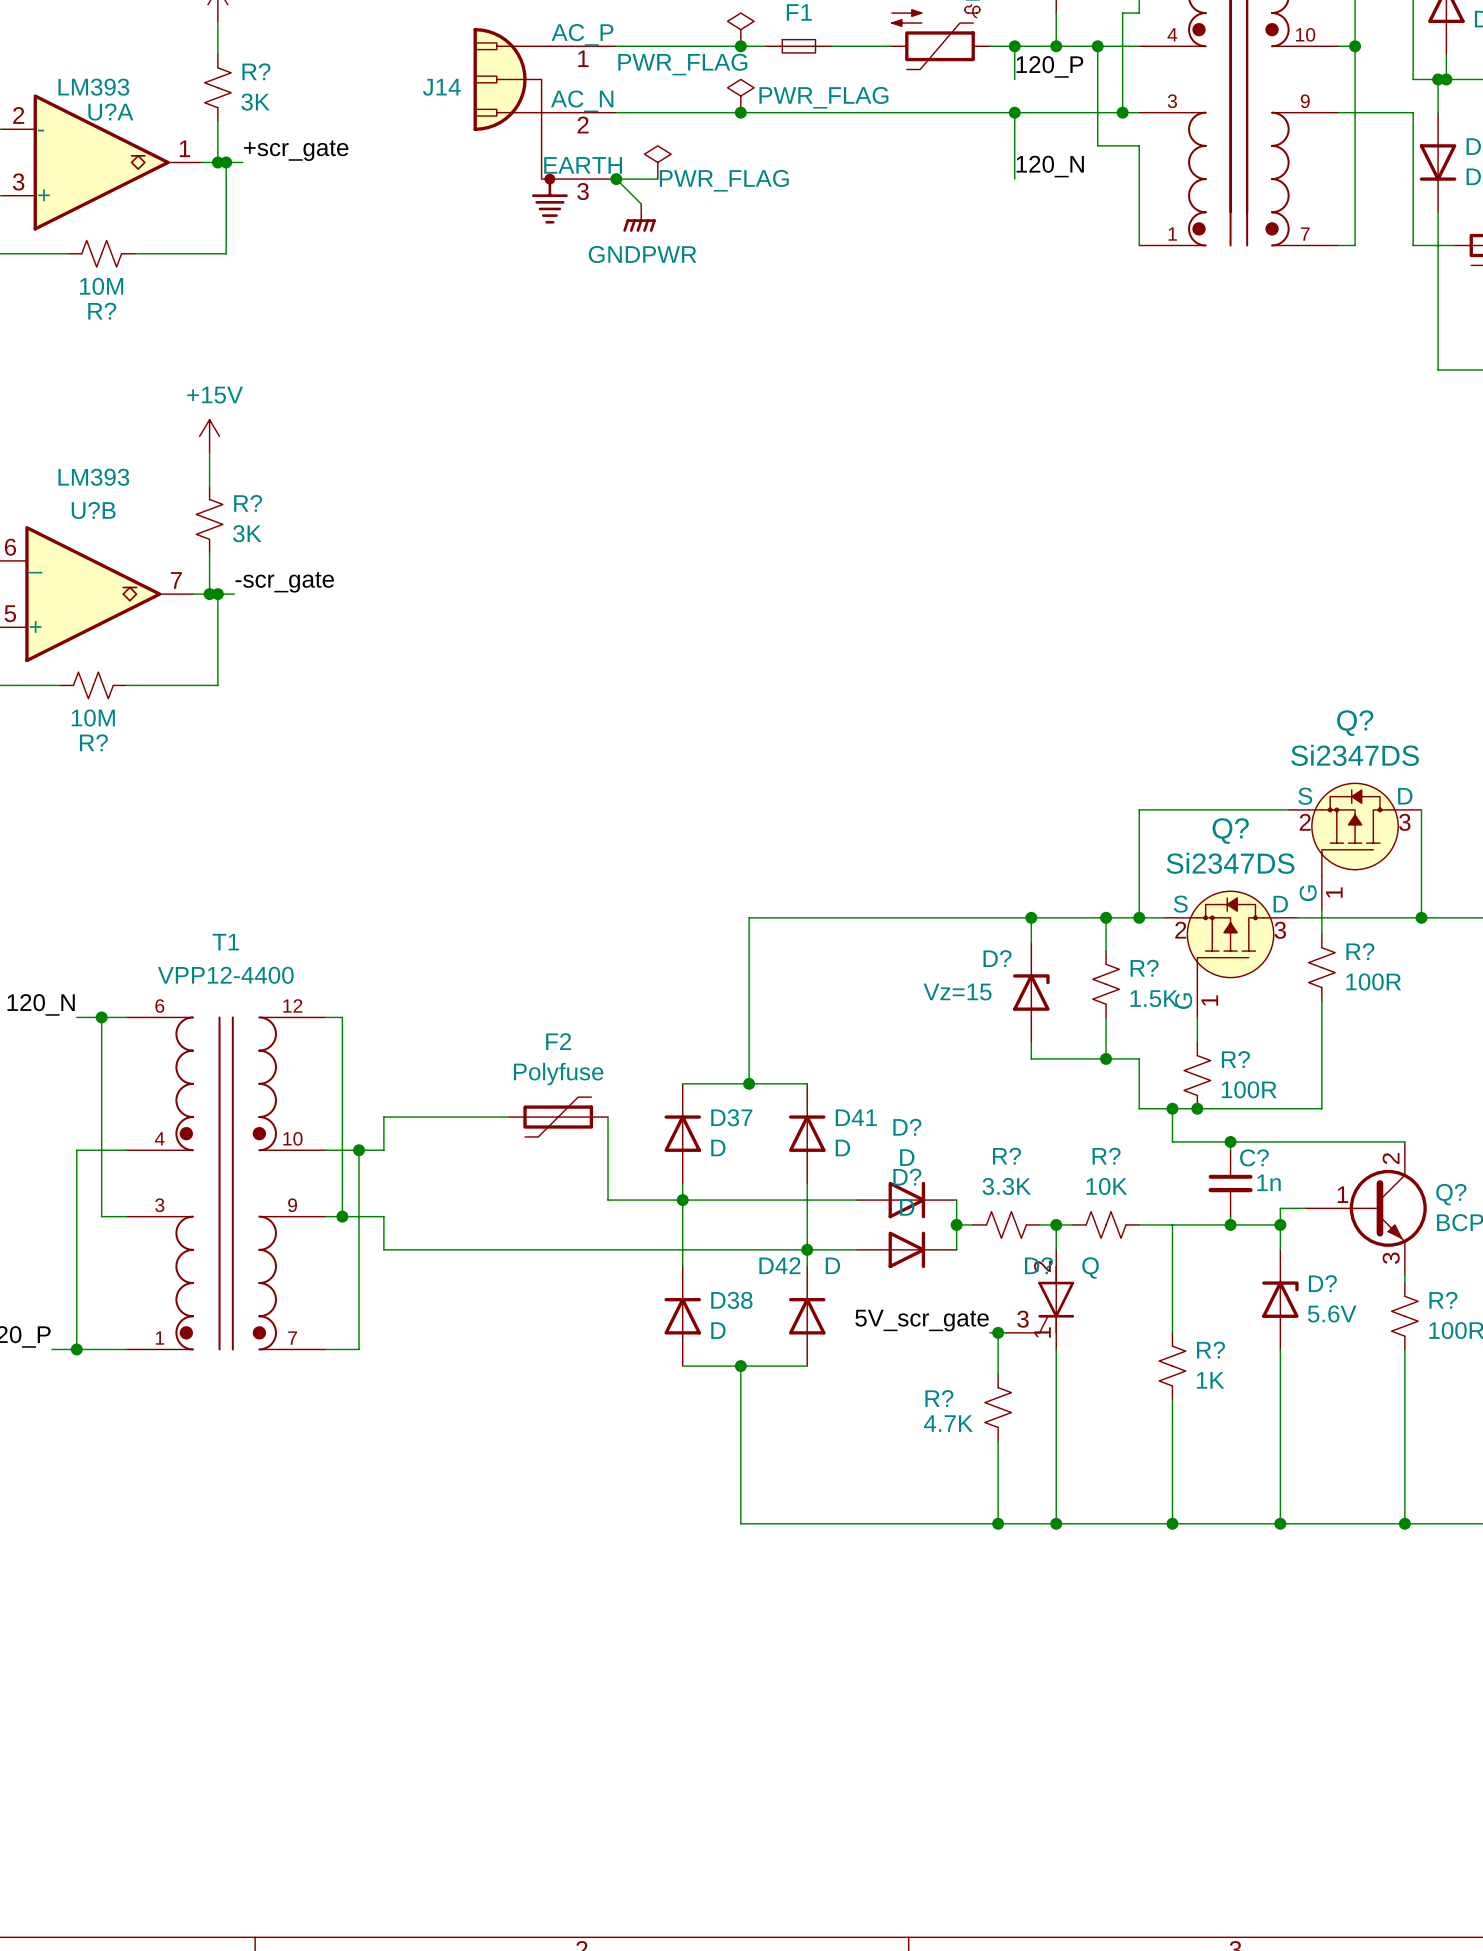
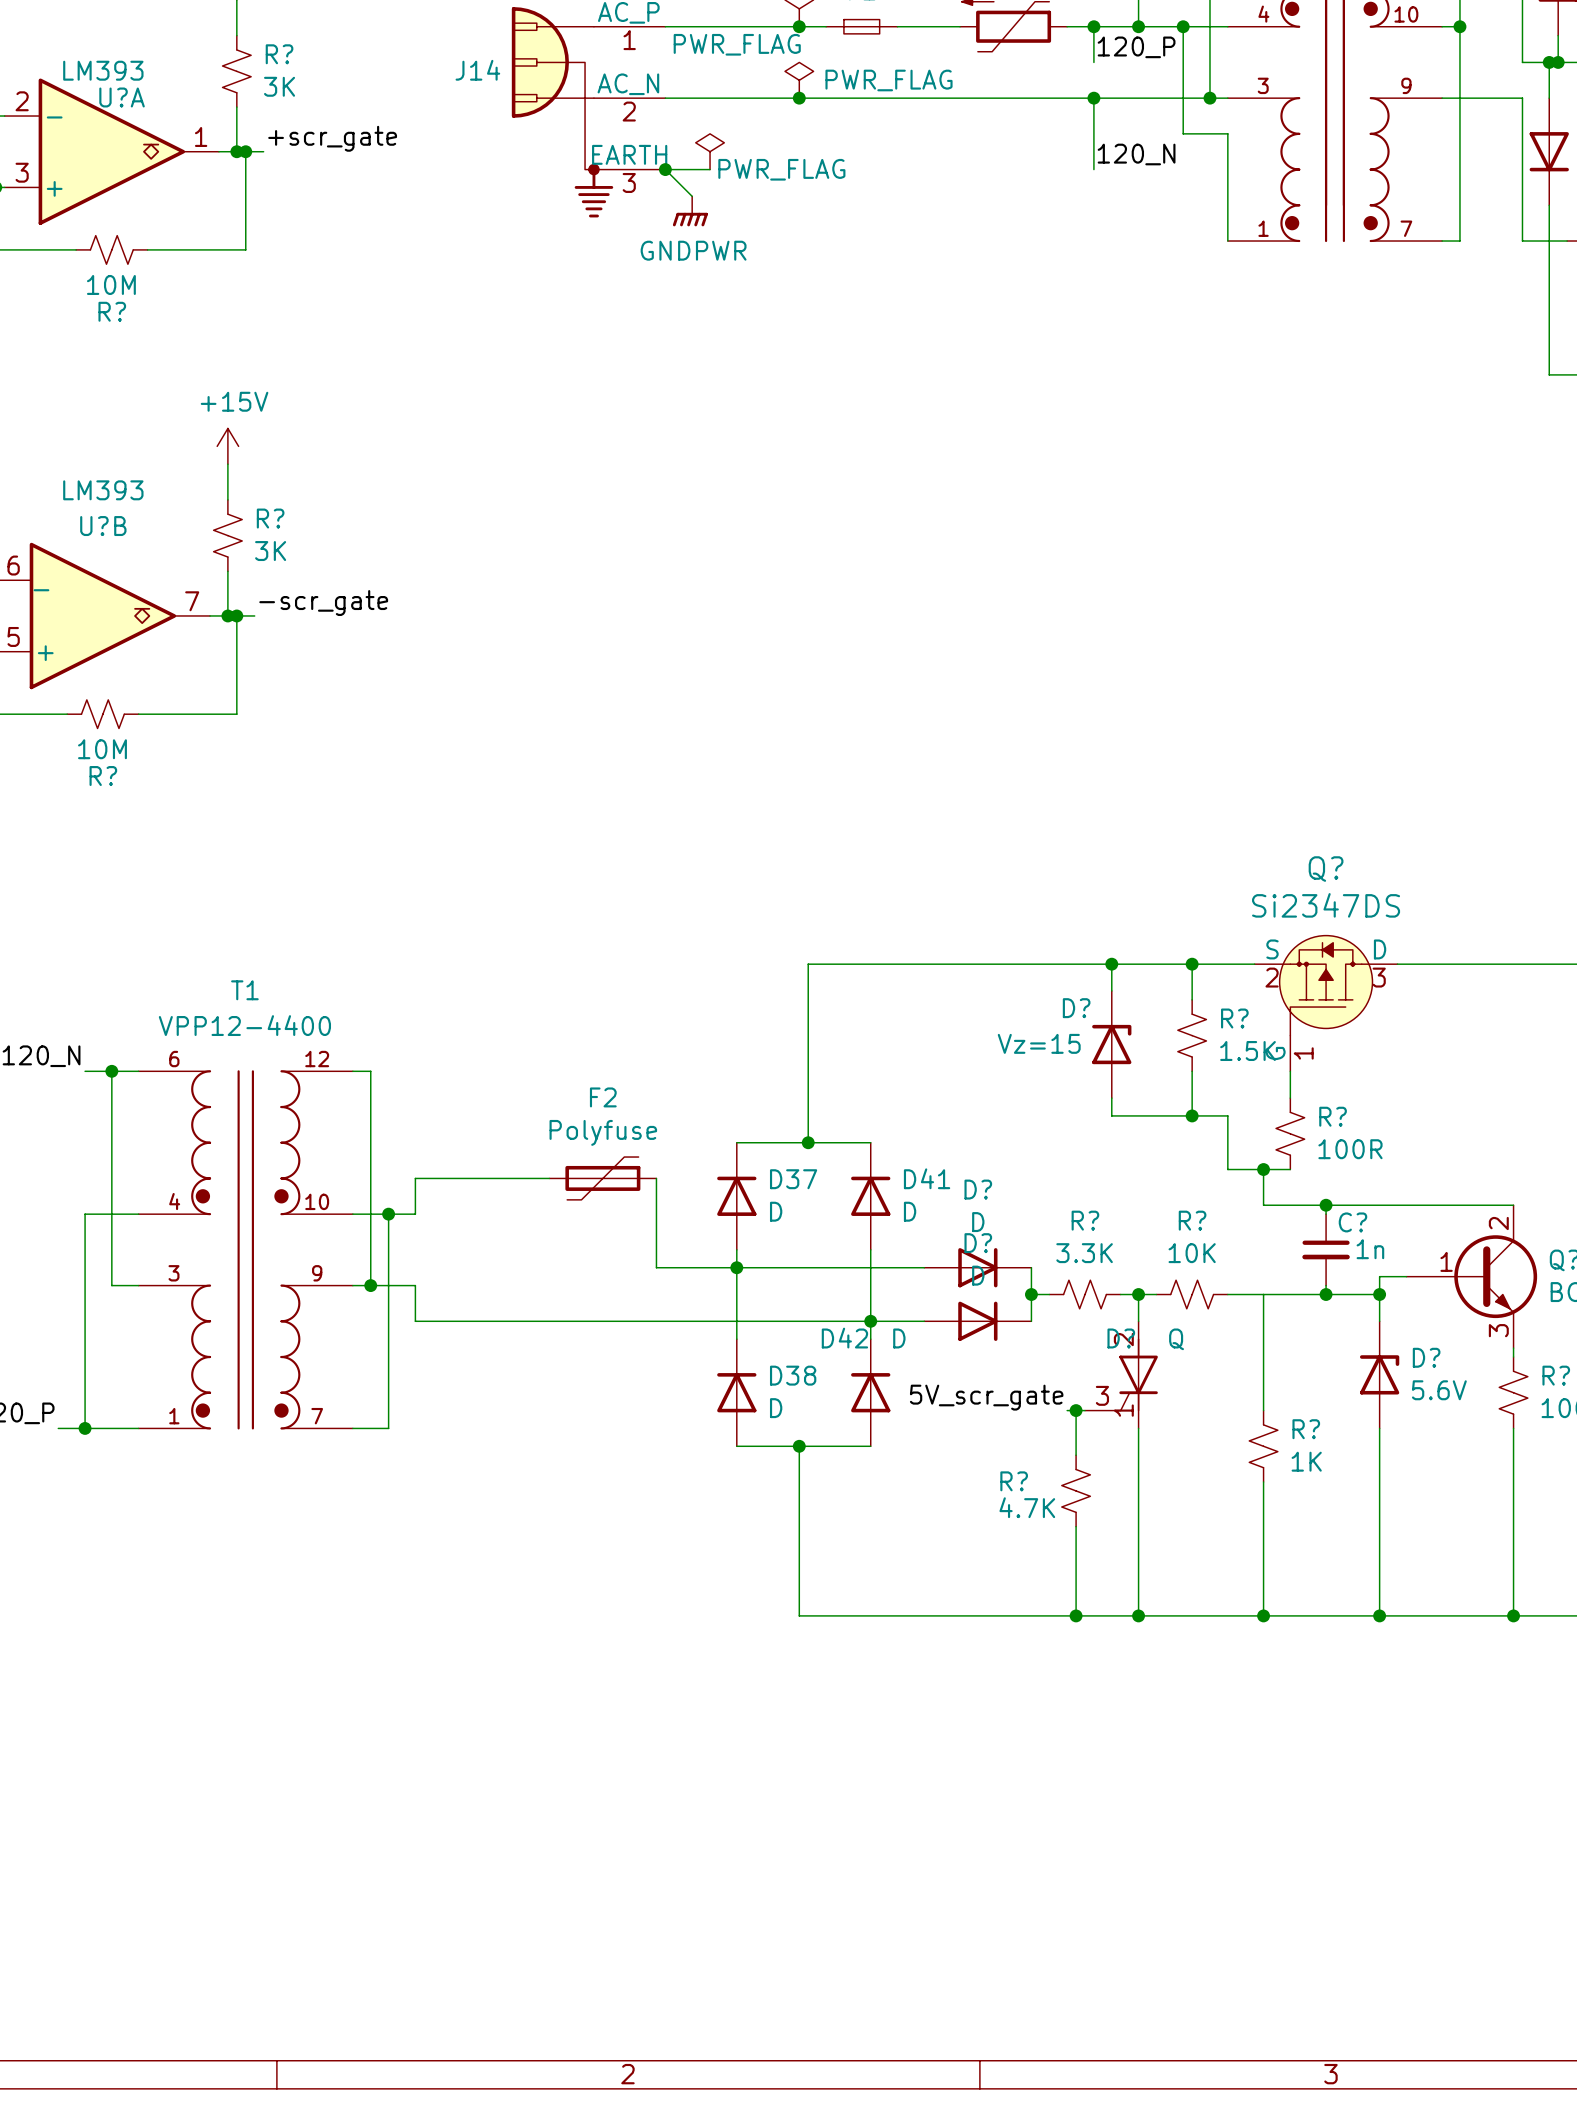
wire: (1288, 809) (1139, 809) (1139, 917) -> none
wire: (1421, 809) (1421, 917) -> none
Q?: Si2347DS (1355, 846) -> none
wire: (1321, 909) (1321, 934) -> none
junction: (1139, 917) -> none
junction: (1421, 917) -> none
R?: 100R (1321, 967) -> none
wire: (1321, 1000) (1321, 1108) (1197, 1108) -> none
junction: (1197, 1108) -> none

